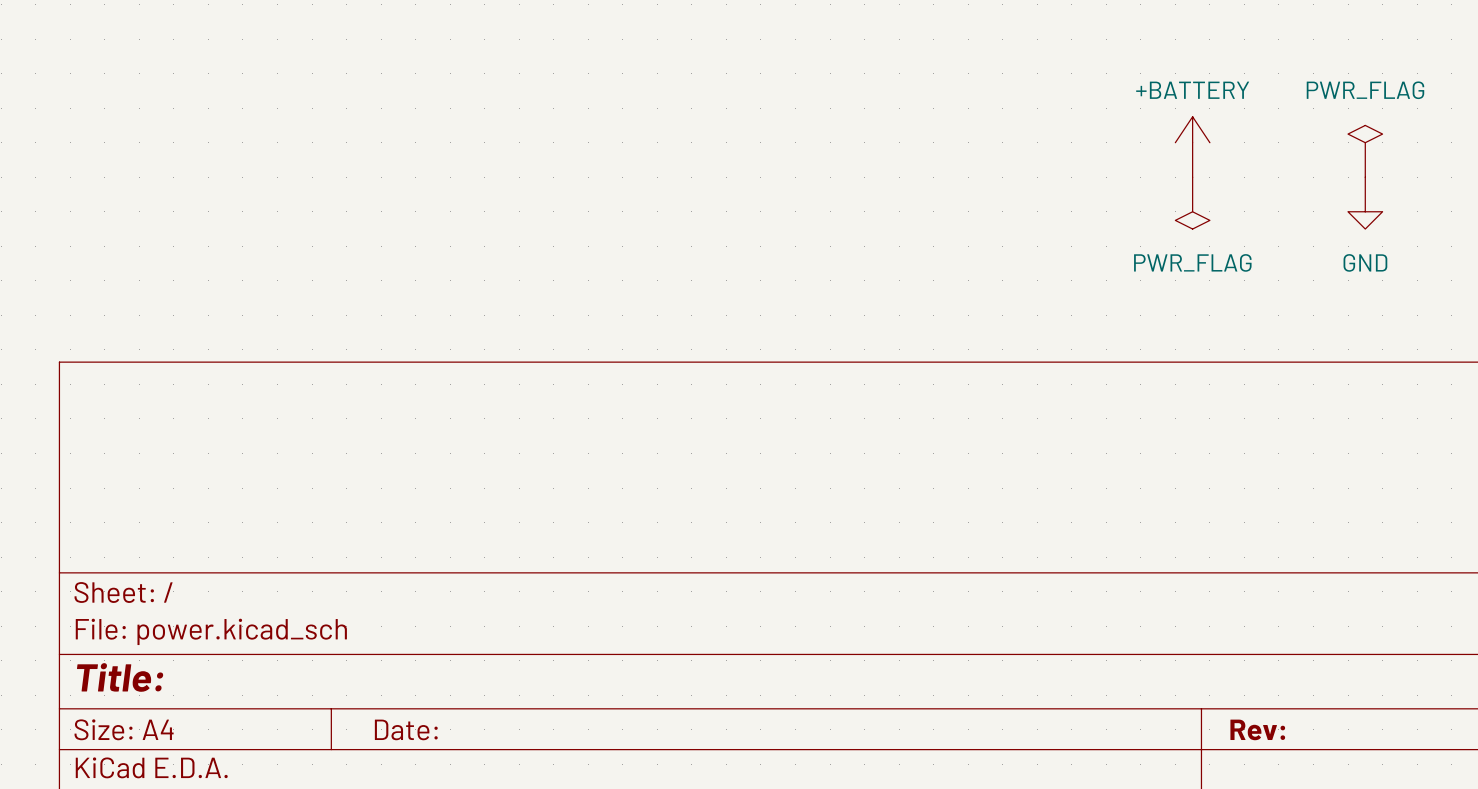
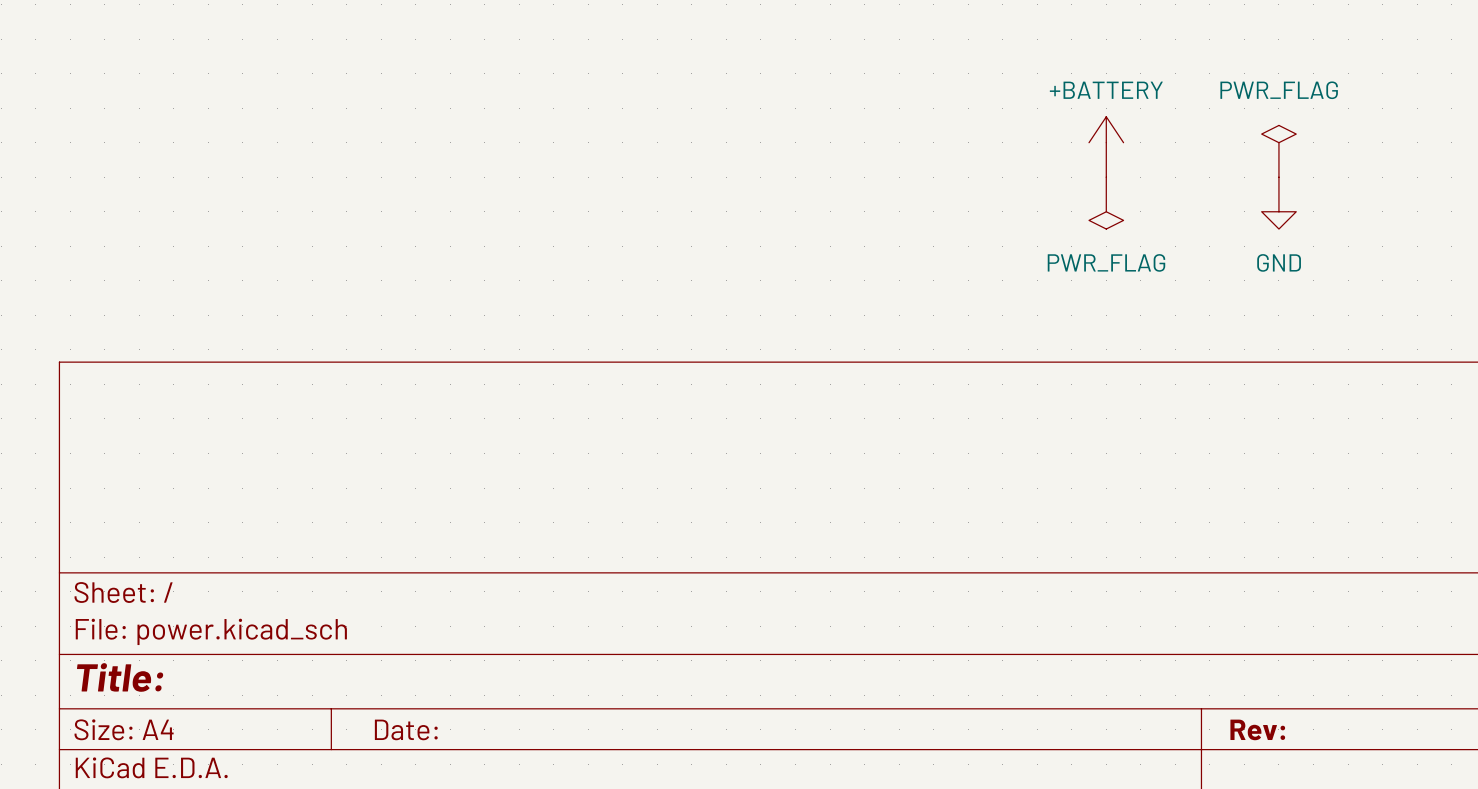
power symbol position: +BATTERY (1192, 147) -> +BATTERY (1106, 147)
power symbol: none -> PWR_FLAG (1278, 151)
power symbol: PWR_FLAG (1365, 151) -> none
power symbol: none -> PWR_FLAG (1106, 203)
power symbol: PWR_FLAG (1192, 203) -> none
power symbol position: GND (1365, 203) -> GND (1278, 203)

